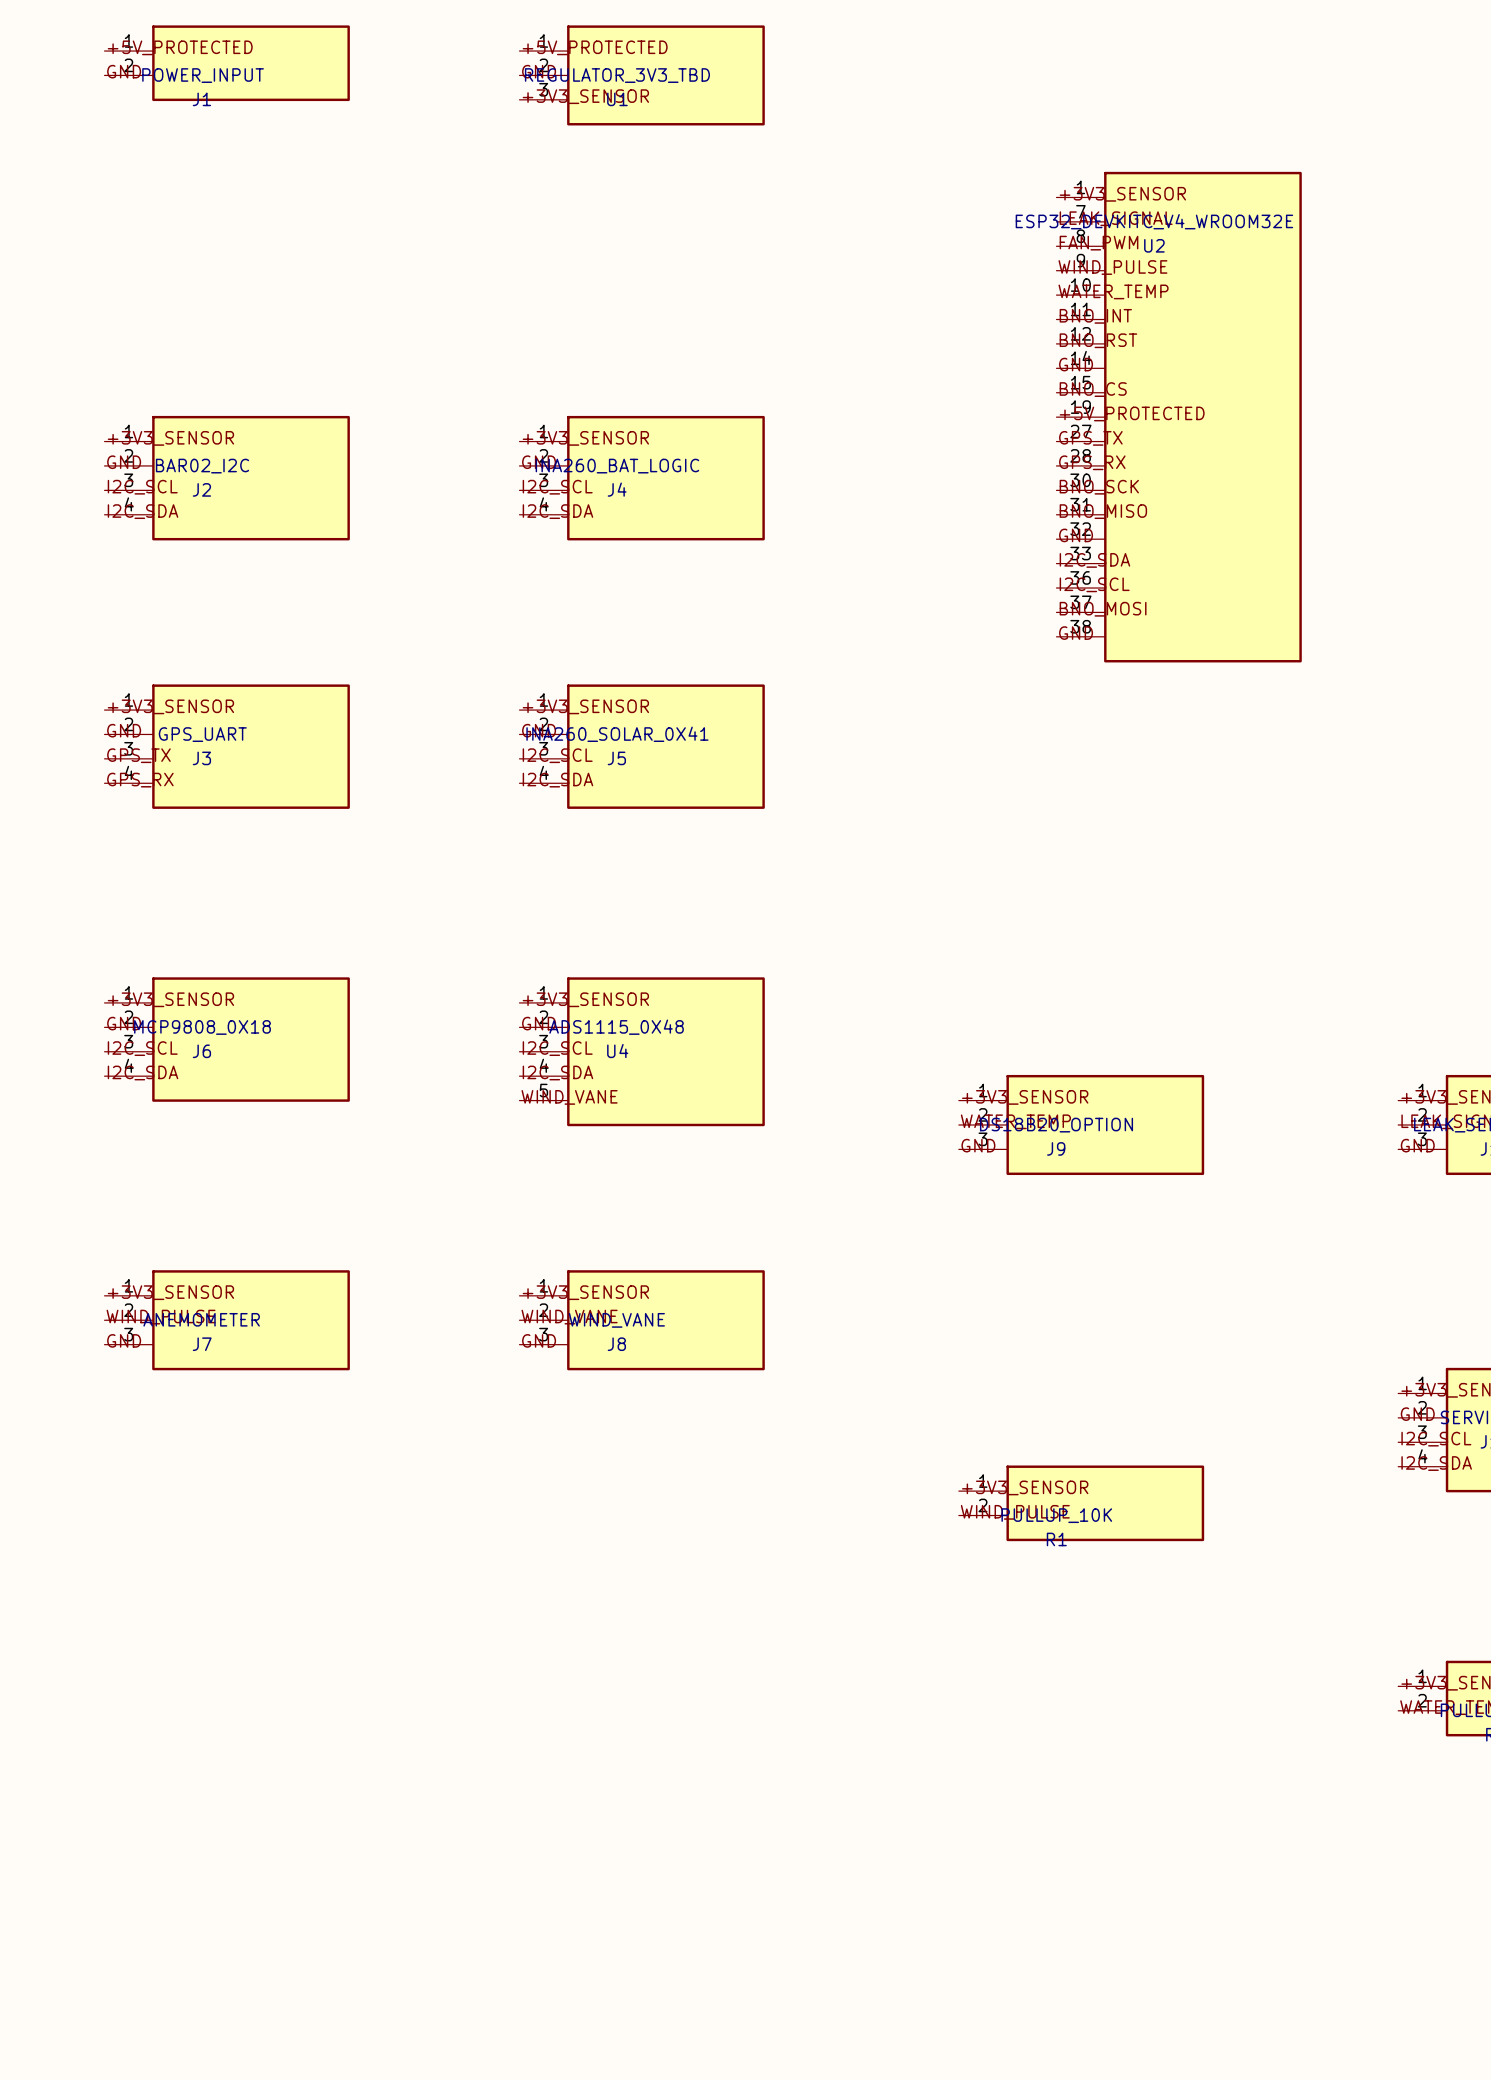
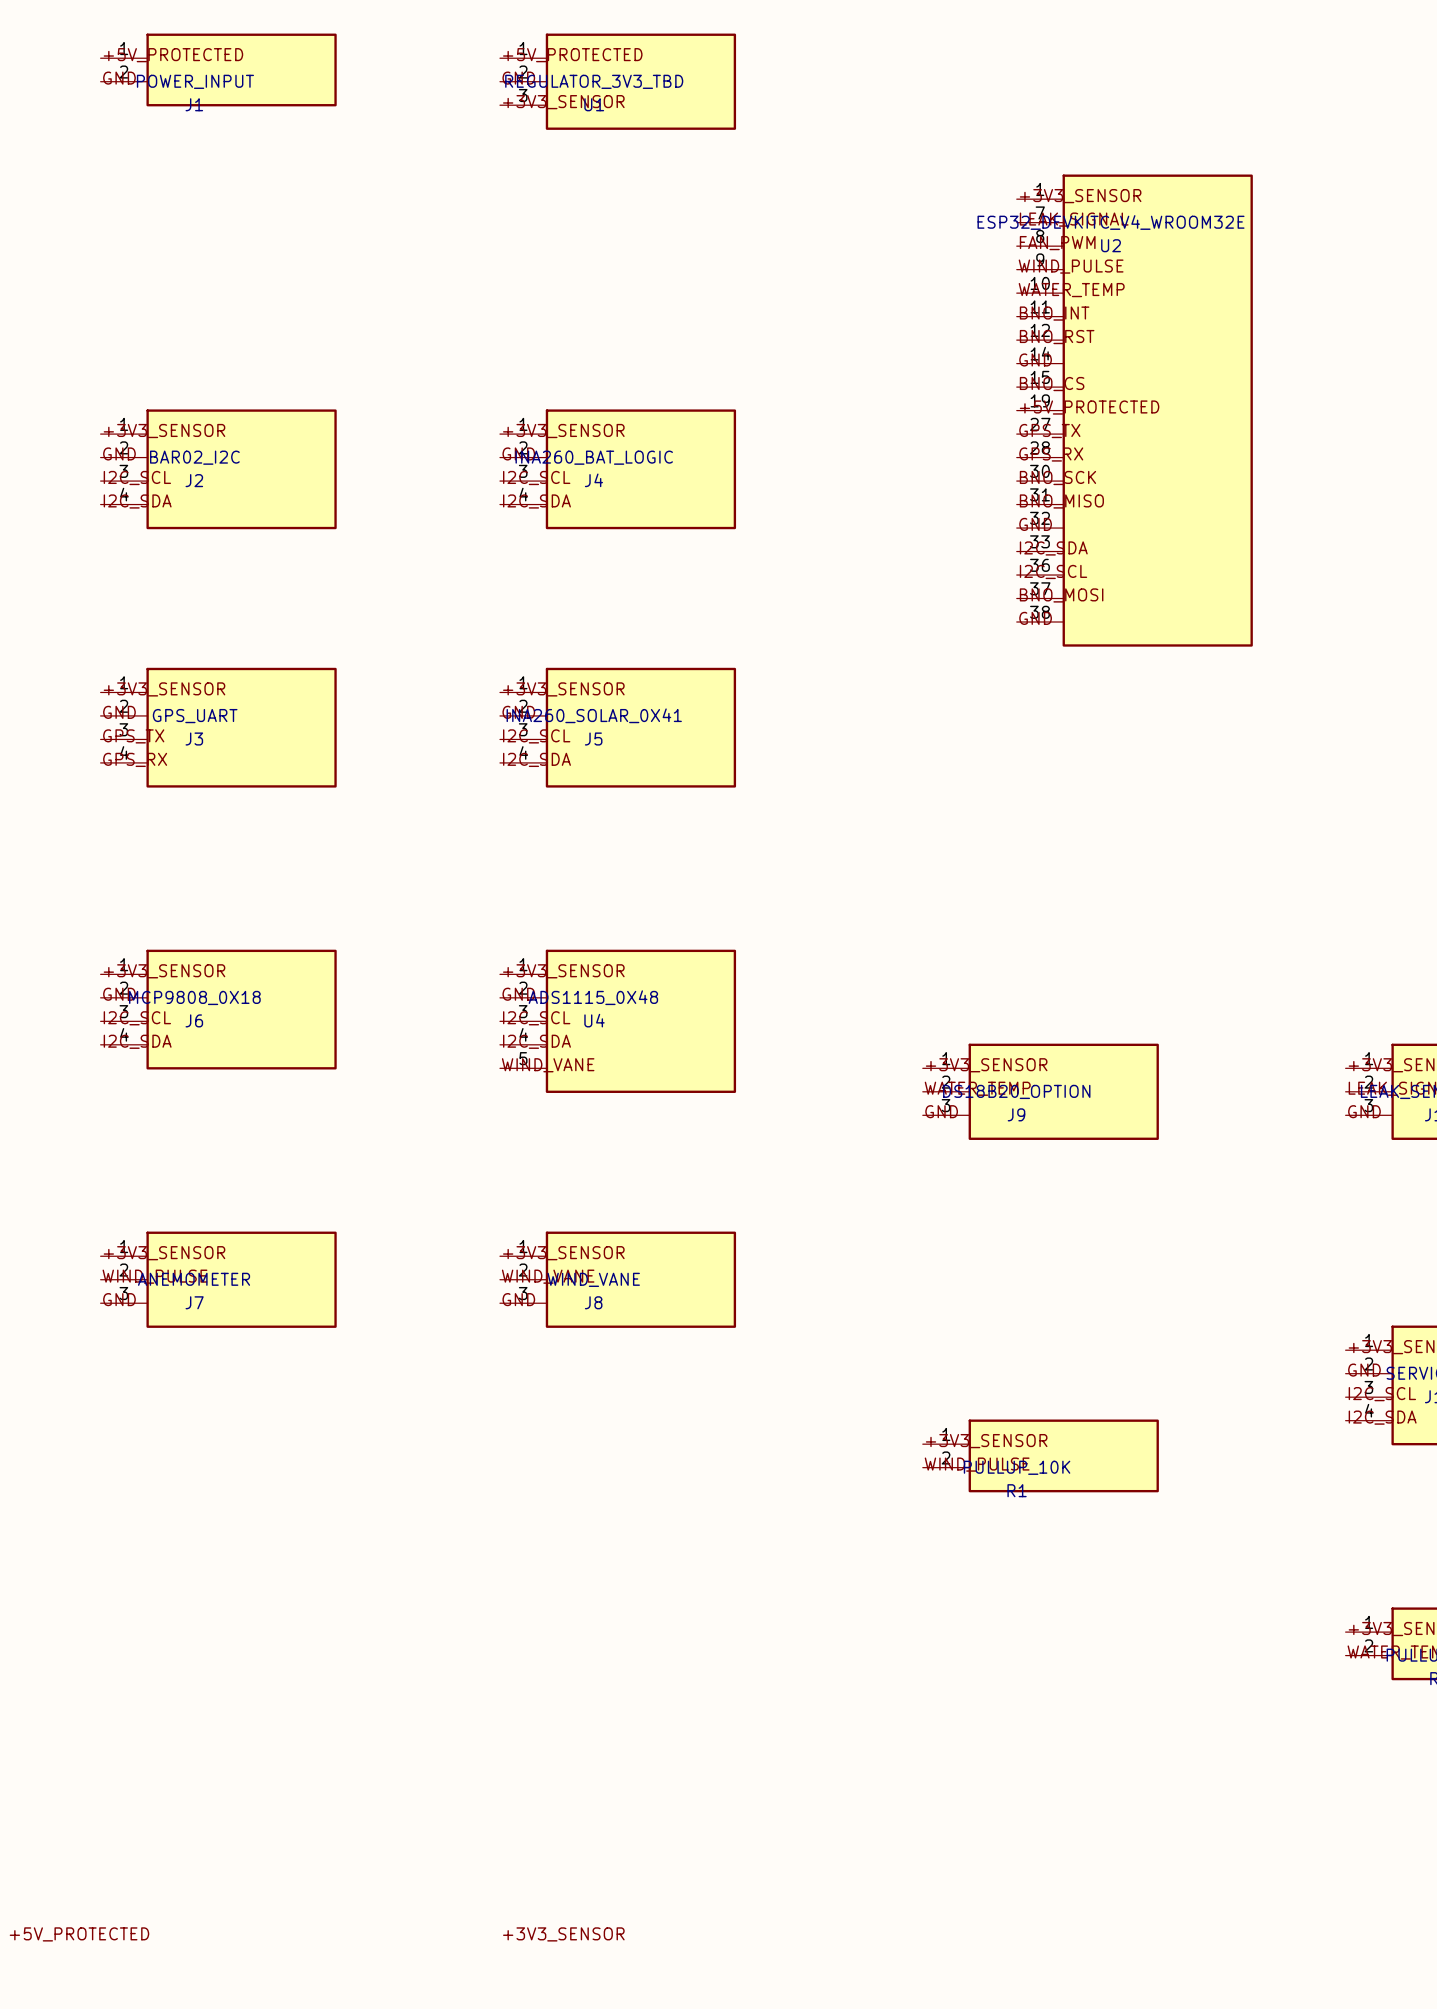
label: none -> +5V_PROTECTED (79, 1934)
label: none -> +3V3_SENSOR (563, 1934)

